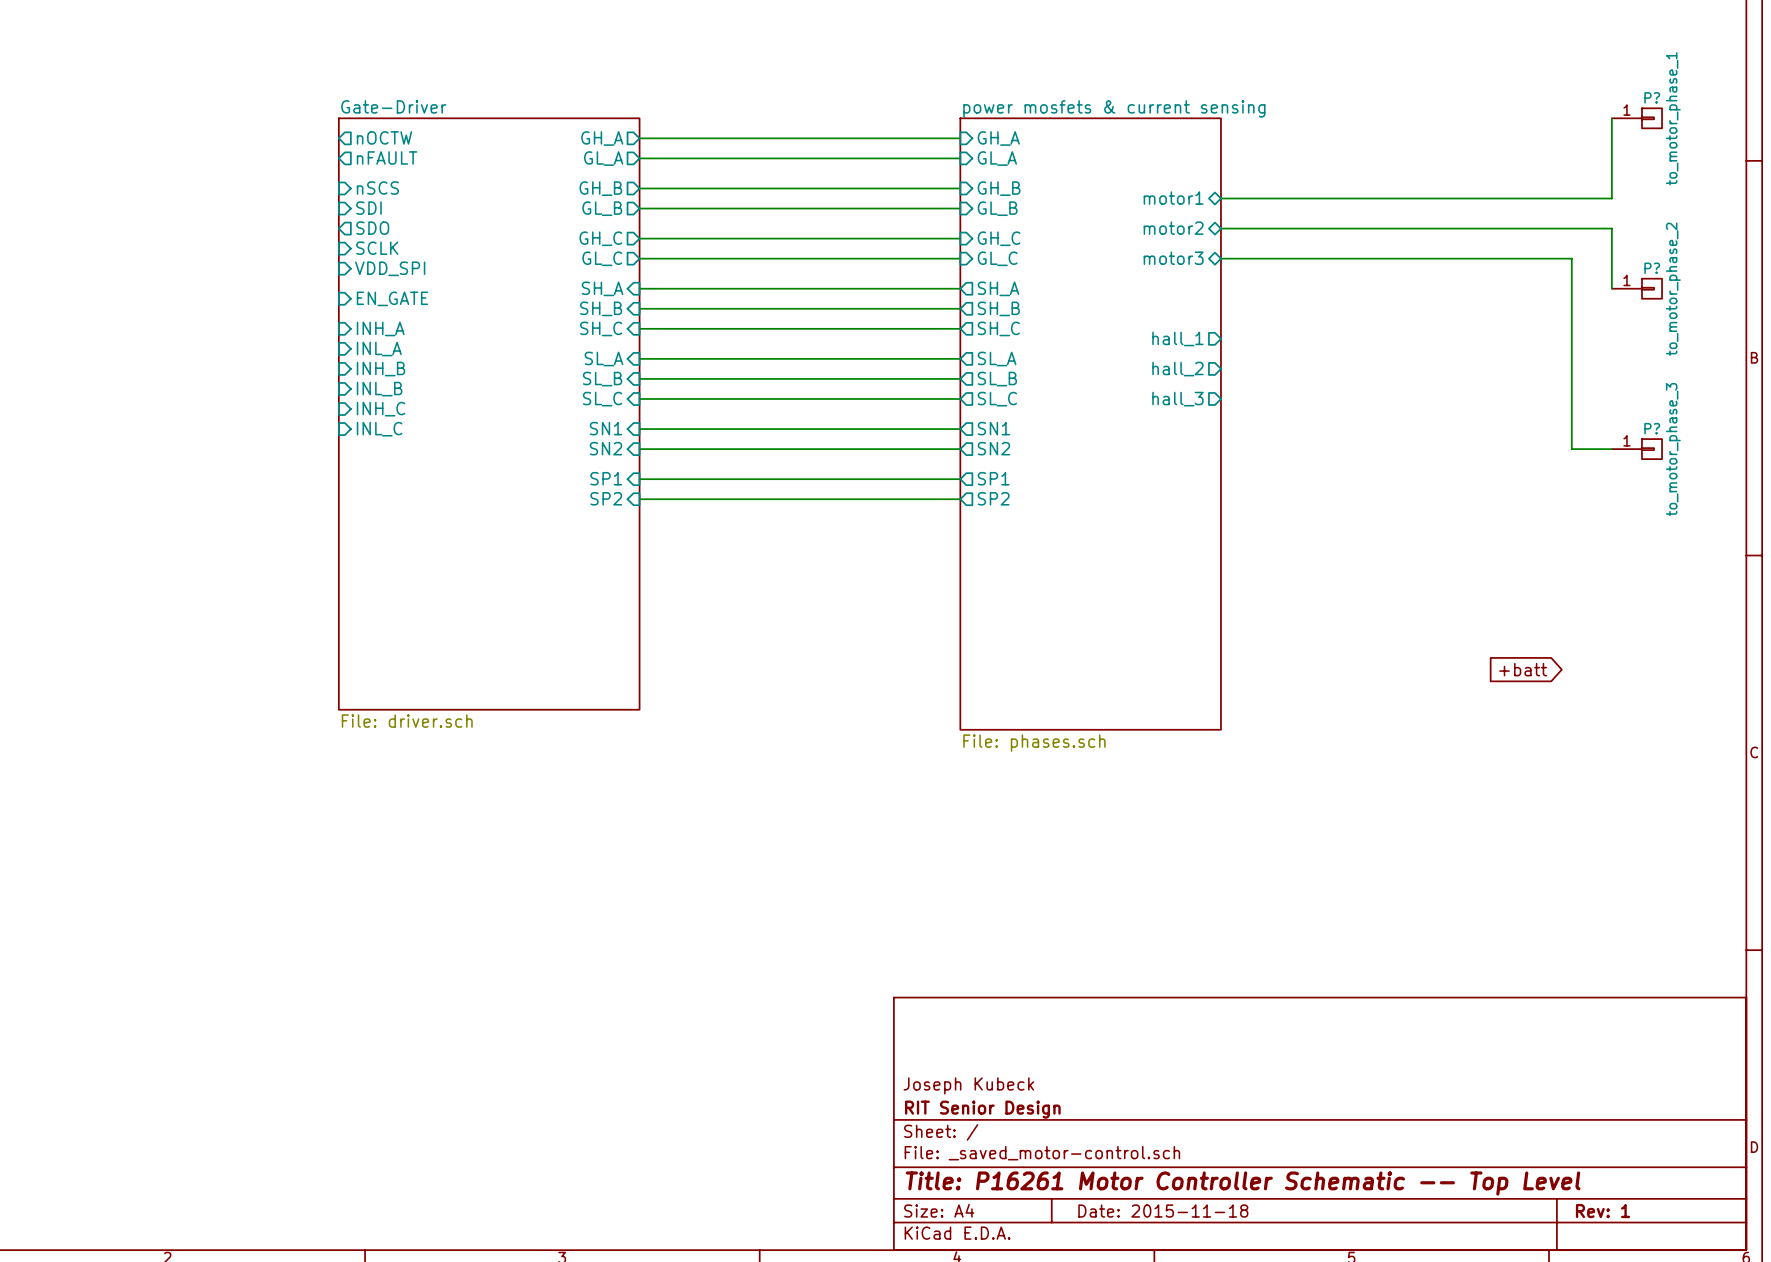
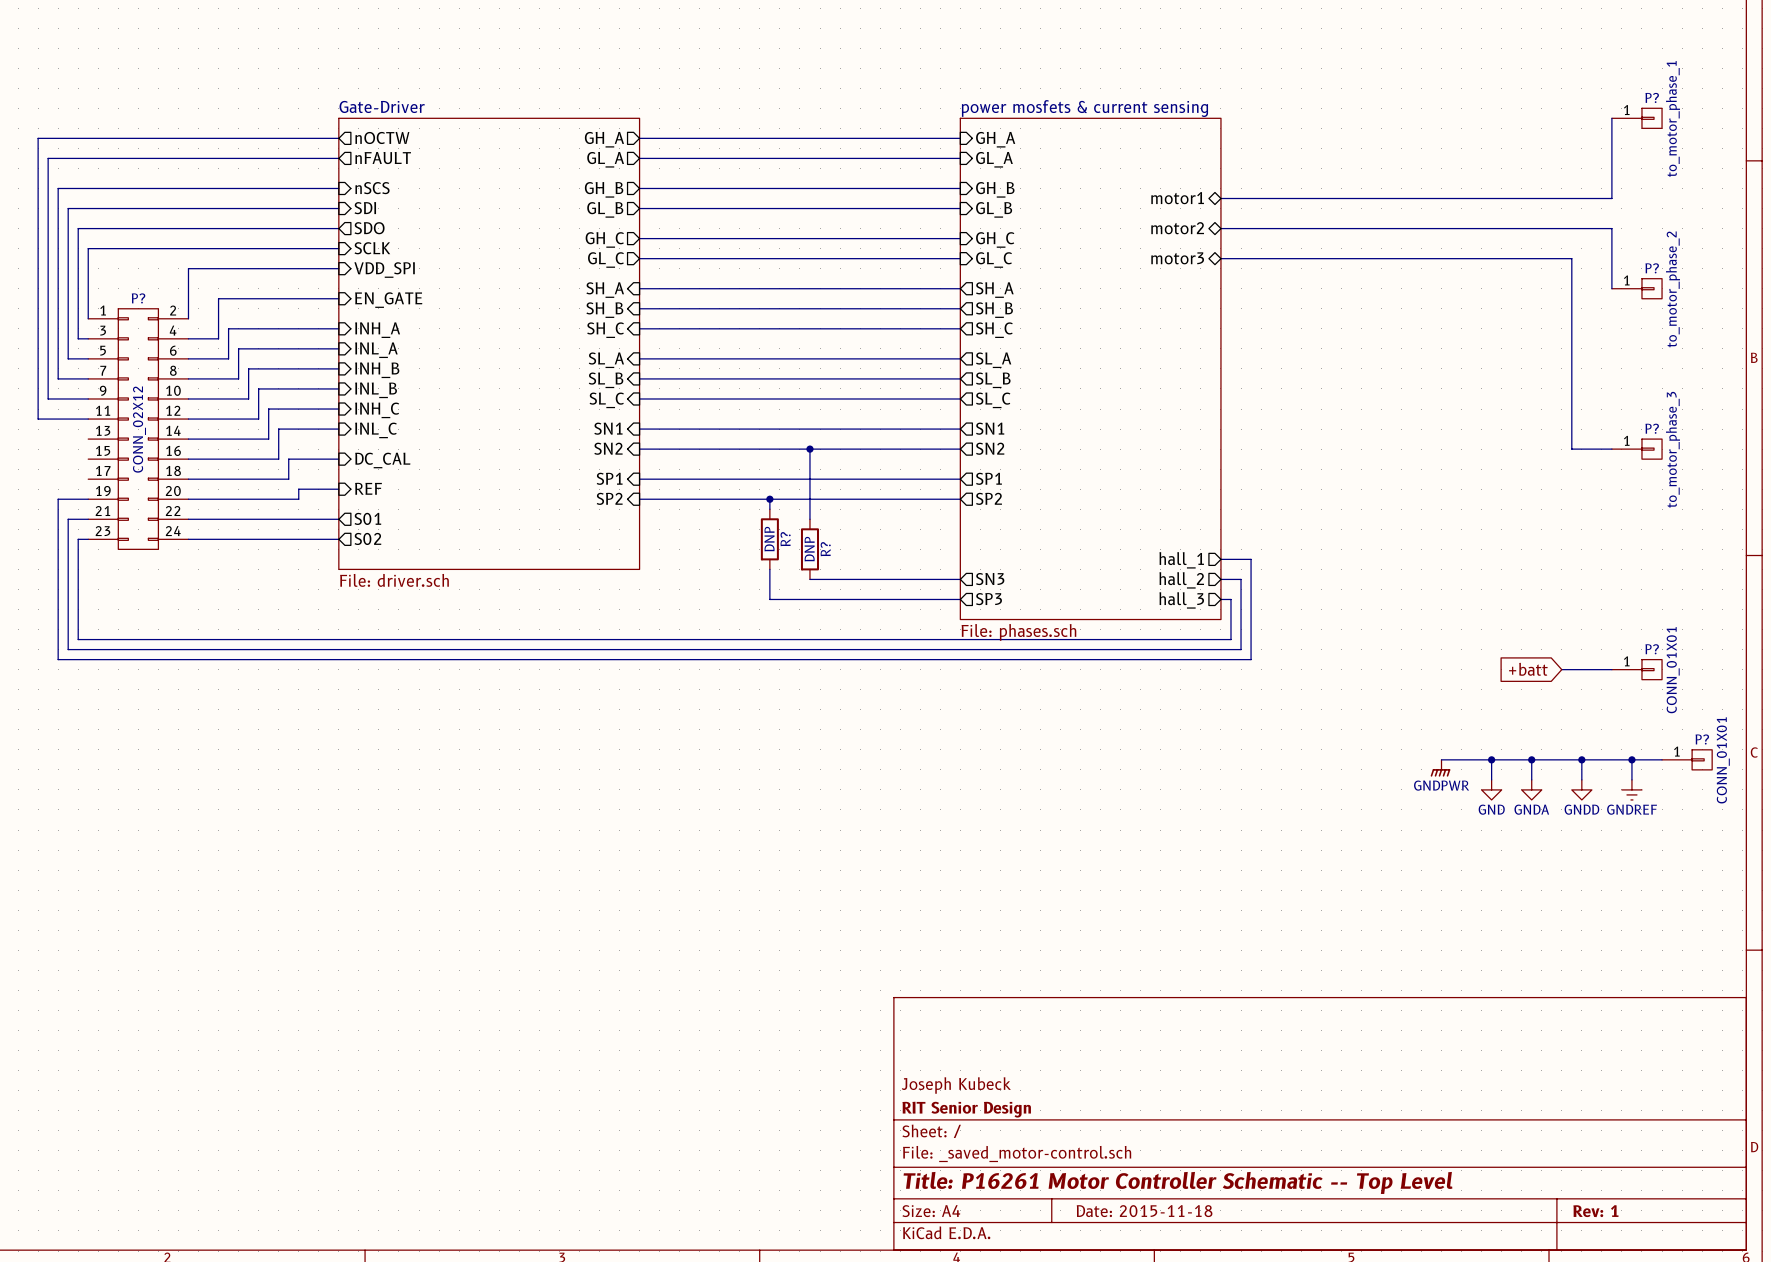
wire: none -> (338, 138) (38, 138) (38, 419) (88, 419)
wire: none -> (338, 158) (48, 158) (48, 398) (88, 398)
wire: none -> (338, 188) (58, 188) (58, 378) (88, 378)
wire: none -> (338, 208) (68, 208) (68, 358) (88, 358)
wire: none -> (338, 228) (78, 228) (78, 338) (88, 338)
wire: none -> (338, 248) (88, 248) (88, 318)
wire: none -> (338, 268) (188, 268) (188, 318)
wire: none -> (338, 298) (218, 298) (218, 338) (188, 338)
wire: none -> (338, 328) (228, 328) (228, 358) (188, 358)
sheet pin: hall_1 (1177, 338) -> none
sheet Gate-Driver: none -> File: driver.sch (489, 343)
wire: none -> (338, 348) (238, 348) (238, 378) (188, 378)
wire: none -> (338, 368) (248, 368) (248, 398) (188, 398)
sheet power mosfets & current sensing: none -> File: phases.sch (1090, 368)
sheet pin: hall_2 (1177, 369) -> none
wire: none -> (338, 388) (258, 388) (258, 419) (188, 419)
sheet pin: hall_3 (1177, 399) -> none
wire: none -> (338, 409) (268, 409) (268, 439) (188, 439)
sheet Gate-Driver: File: driver.sch (489, 414) -> none
sheet power mosfets & current sensing: File: phases.sch (1090, 424) -> none
P?: none -> CONN_02X12 (138, 429)
wire: none -> (338, 429) (278, 429) (278, 459) (188, 459)
wire: none -> (809, 449) (809, 519)
junction: none -> (809, 449)
wire: none -> (338, 459) (288, 459) (288, 479) (188, 479)
sheet pin: none -> DC_CAL (382, 460)
sheet pin: none -> REF (368, 488)
wire: none -> (338, 489) (298, 489) (298, 499) (188, 499)
wire: none -> (88, 499) (58, 499) (58, 659) (1251, 659) (1251, 559) (1220, 559)
wire: none -> (769, 499) (769, 509)
junction: none -> (769, 499)
sheet pin: none -> S01 (367, 518)
wire: none -> (88, 519) (68, 519) (68, 649) (1241, 649) (1241, 579) (1220, 579)
wire: none -> (188, 519) (338, 519)
sheet pin: none -> S02 (367, 538)
wire: none -> (88, 539) (78, 539) (78, 639) (1230, 639) (1230, 599) (1220, 599)
wire: none -> (188, 539) (338, 539)
R?: none -> DNP (769, 539)
R?: none -> DNP (809, 549)
sheet pin: none -> hall_1 (1181, 560)
wire: none -> (769, 569) (769, 599) (960, 599)
sheet pin: none -> SN3 (990, 579)
wire: none -> (809, 579) (960, 579)
sheet pin: none -> hall_2 (1181, 580)
sheet pin: none -> SP3 (988, 599)
sheet pin: none -> hall_3 (1181, 600)
wire: none -> (1561, 669) (1611, 669)
P?: none -> CONN_01X01 (1636, 669)
wire: none -> (1441, 759) (1662, 759)
wire: none -> (1491, 759) (1491, 779)
junction: none -> (1491, 759)
wire: none -> (1531, 759) (1531, 779)
junction: none -> (1531, 759)
wire: none -> (1581, 759) (1581, 779)
junction: none -> (1581, 759)
wire: none -> (1631, 759) (1631, 779)
junction: none -> (1631, 759)
P?: none -> CONN_01X01 (1687, 759)
power symbol: none -> GNDPWR (1440, 768)
power symbol: none -> GND (1491, 789)
power symbol: none -> GNDA (1531, 789)
power symbol: none -> GNDD (1581, 789)
power symbol: none -> GNDREF (1631, 789)

